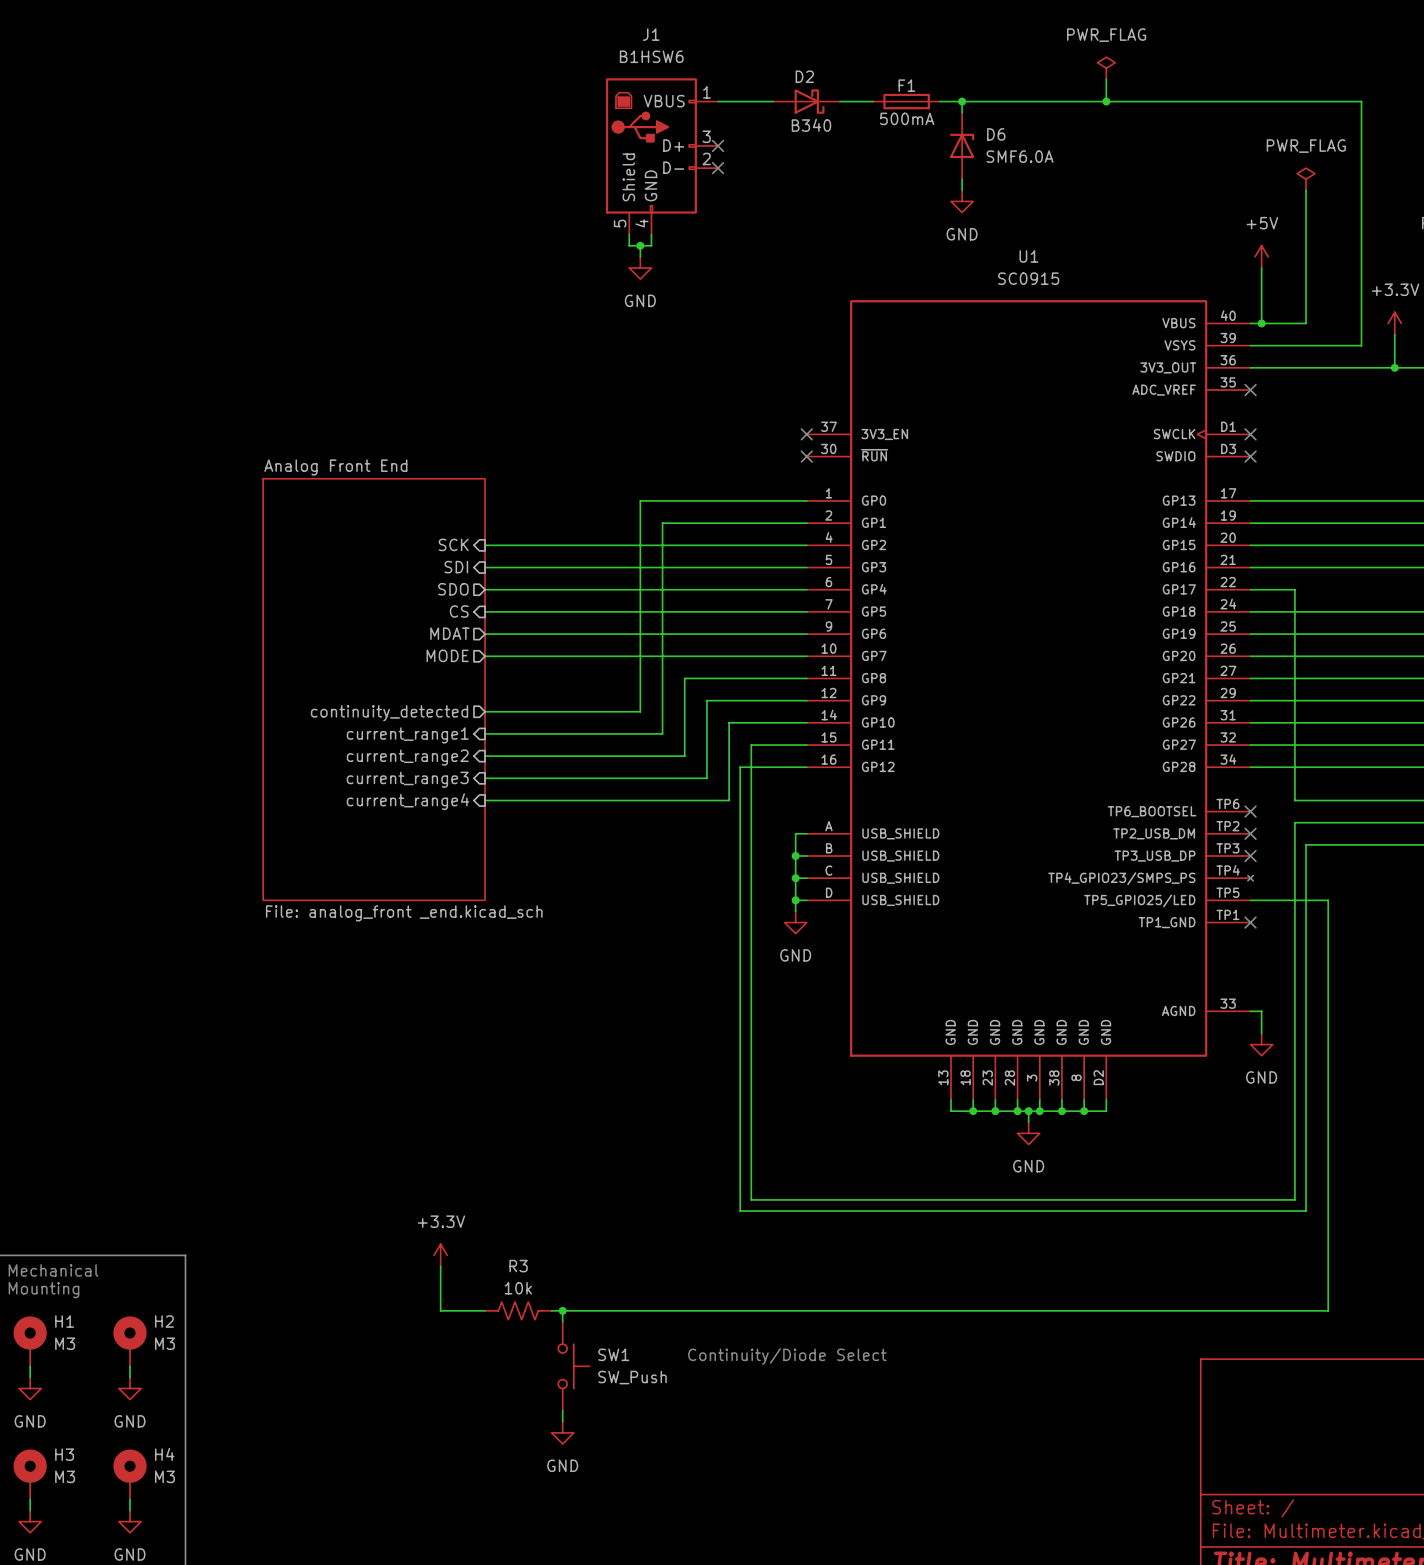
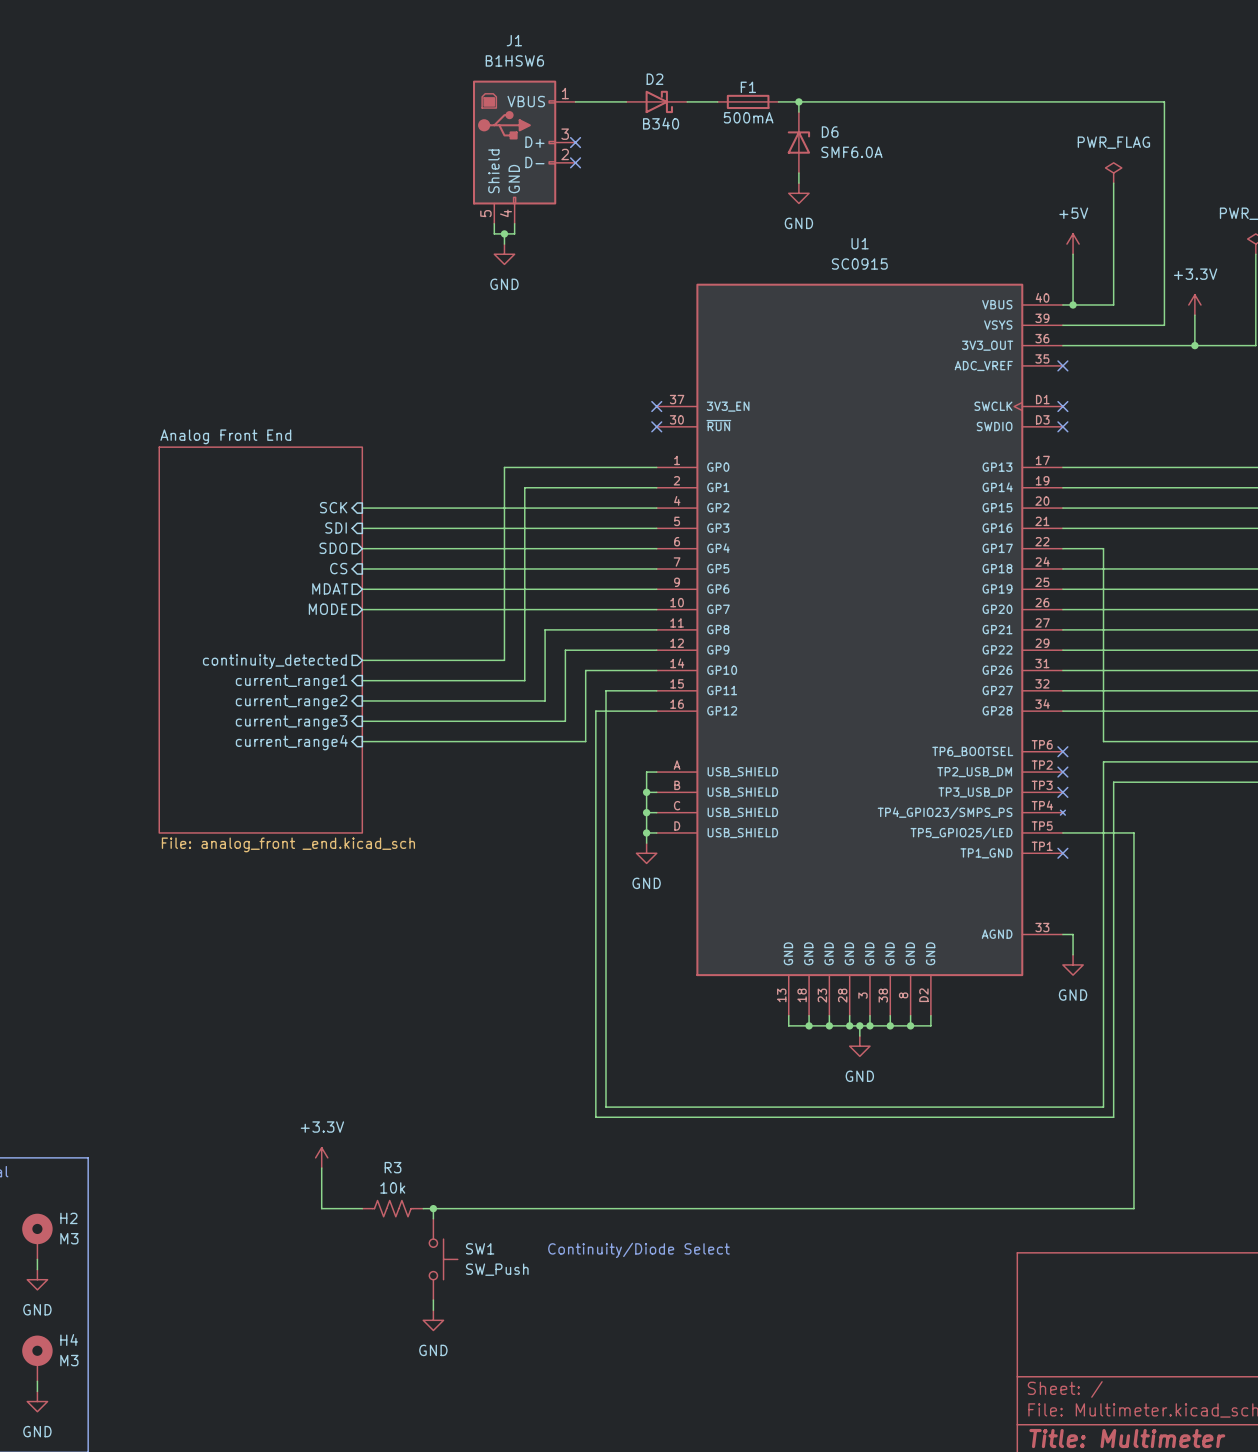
power symbol: PWR_FLAG (1106, 68) -> none
wire: (1106, 79) (1106, 101) -> none
junction: (1106, 101) -> none

